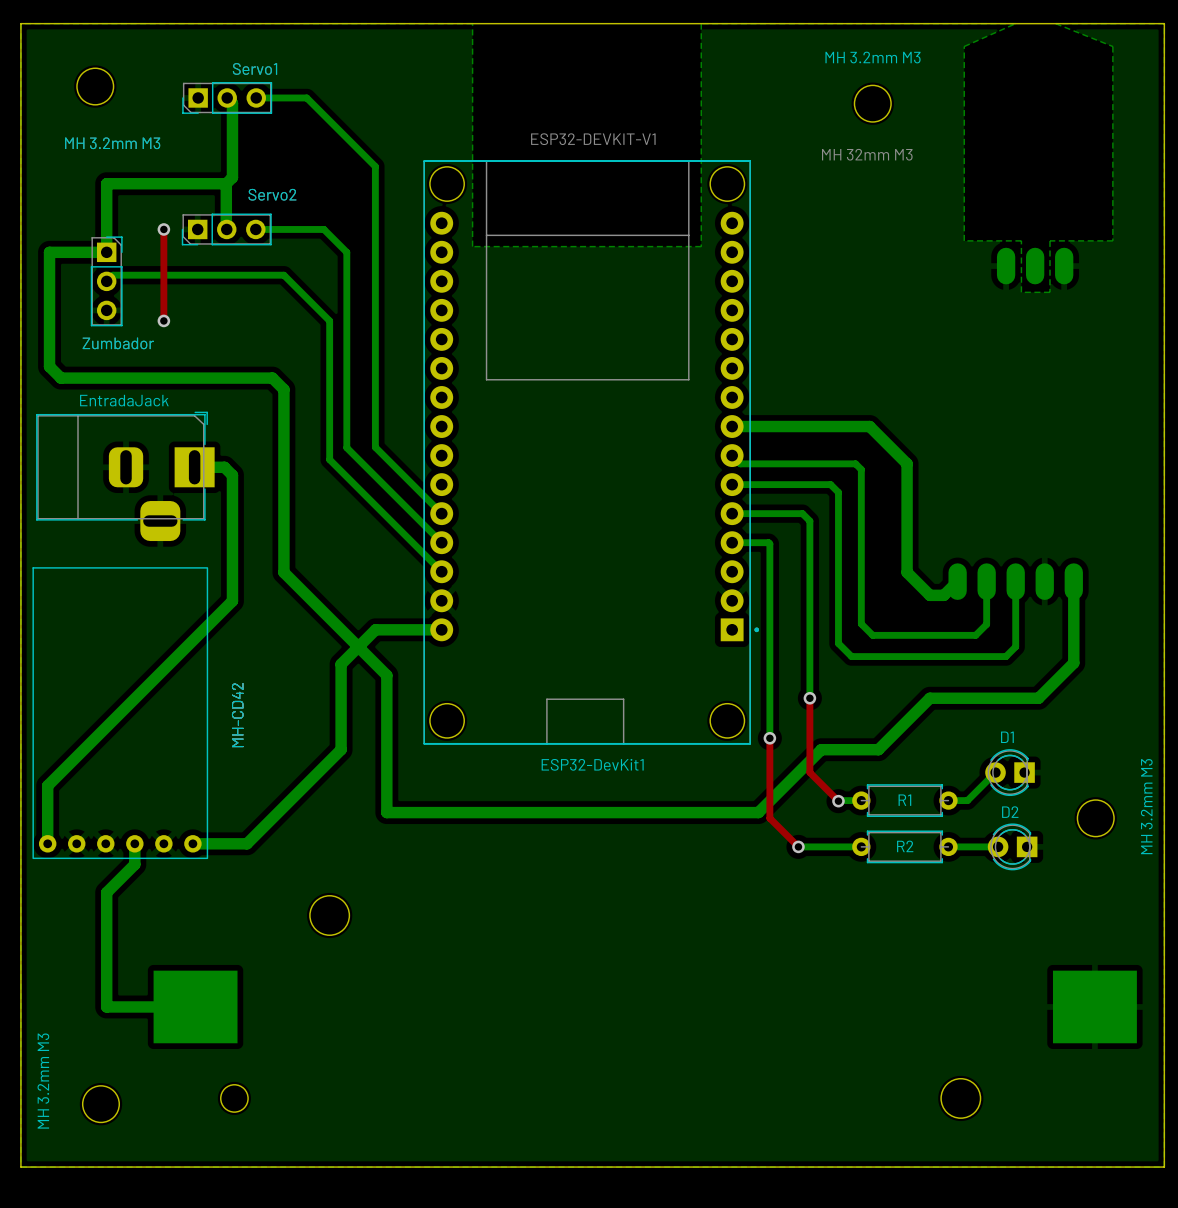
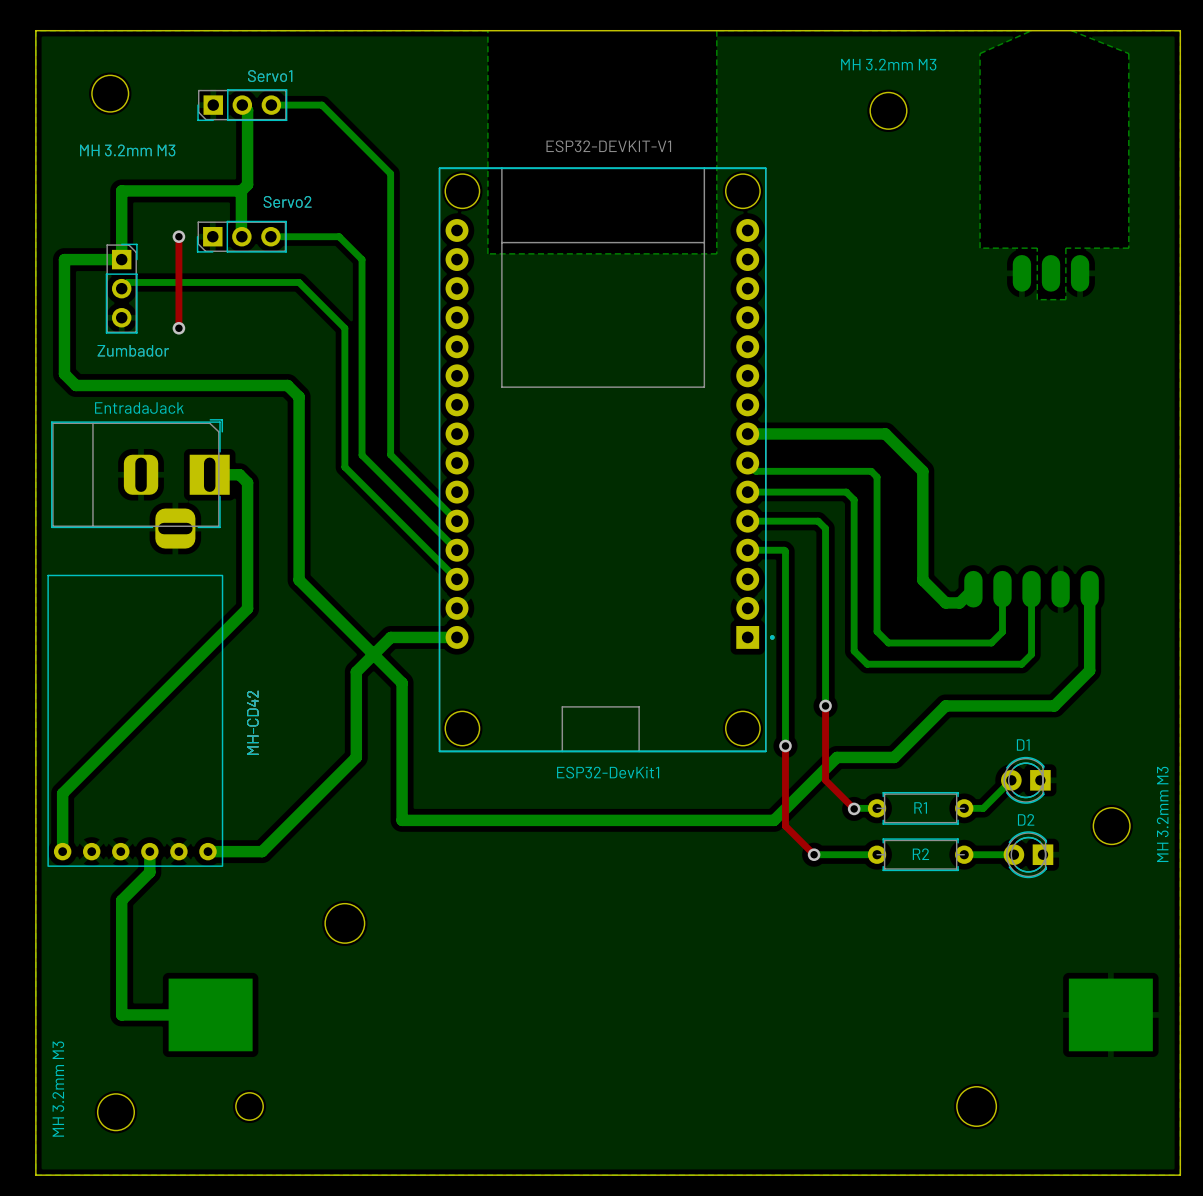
MH 3.2mm M3 value: MH 32mm M3 (867, 154) -> none

